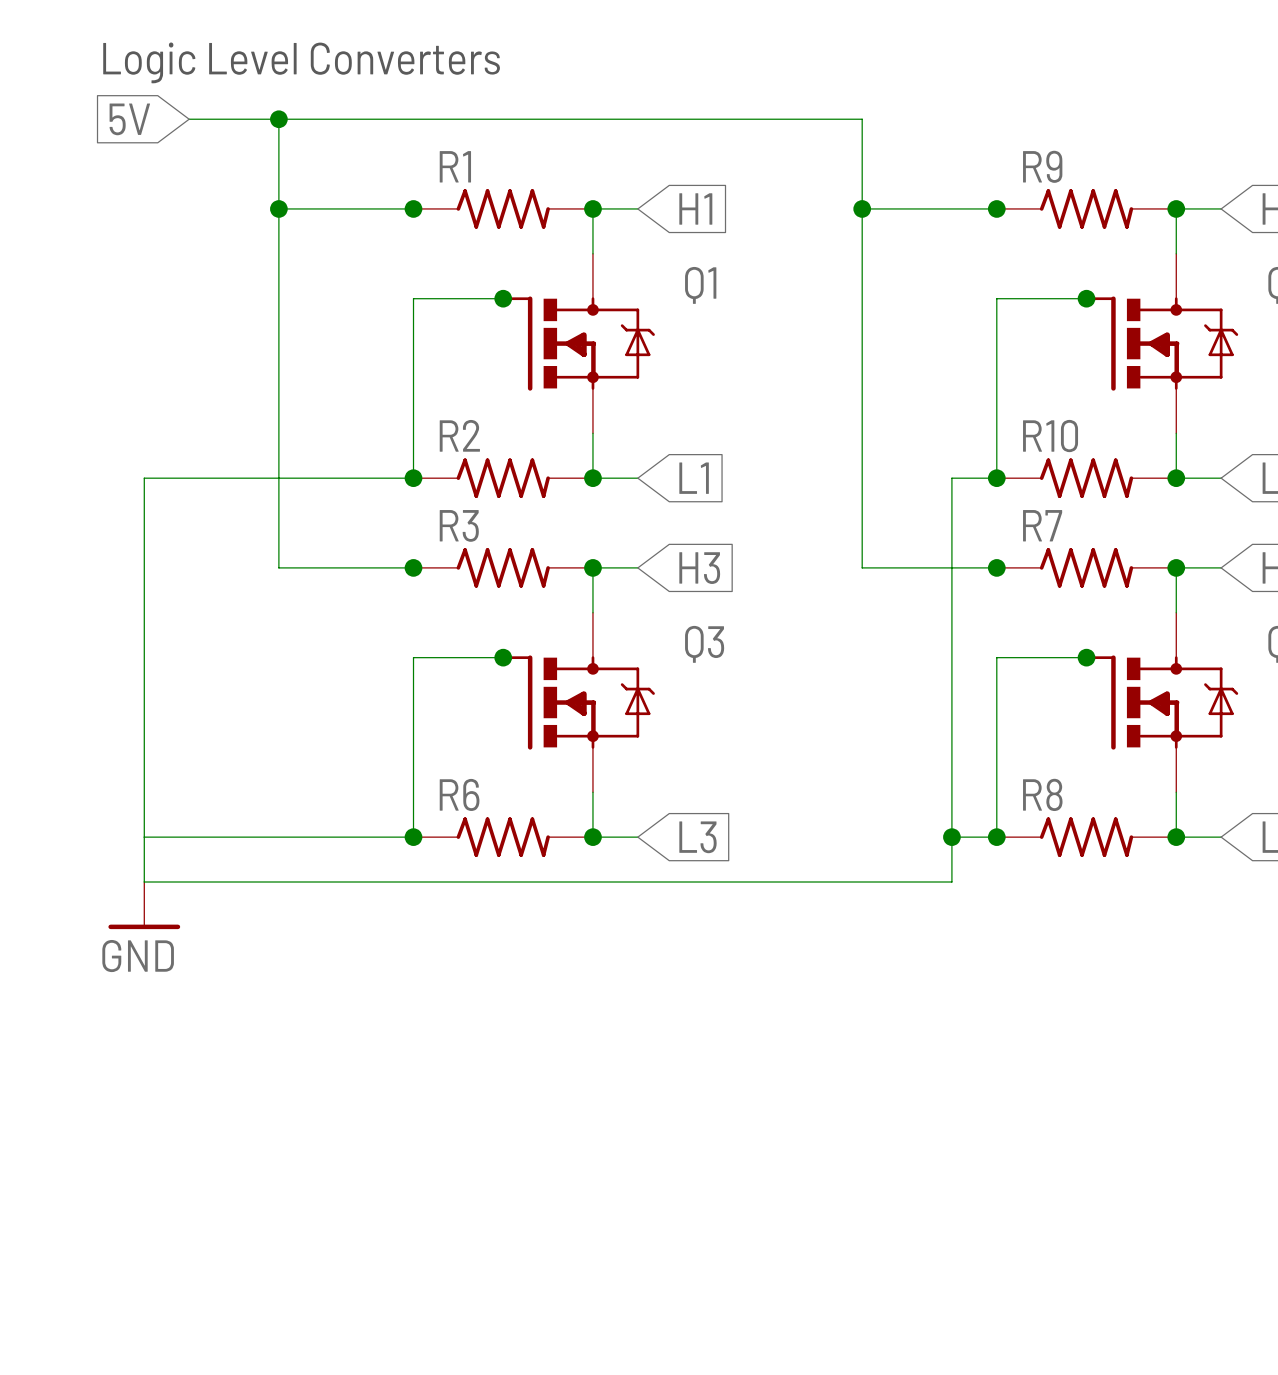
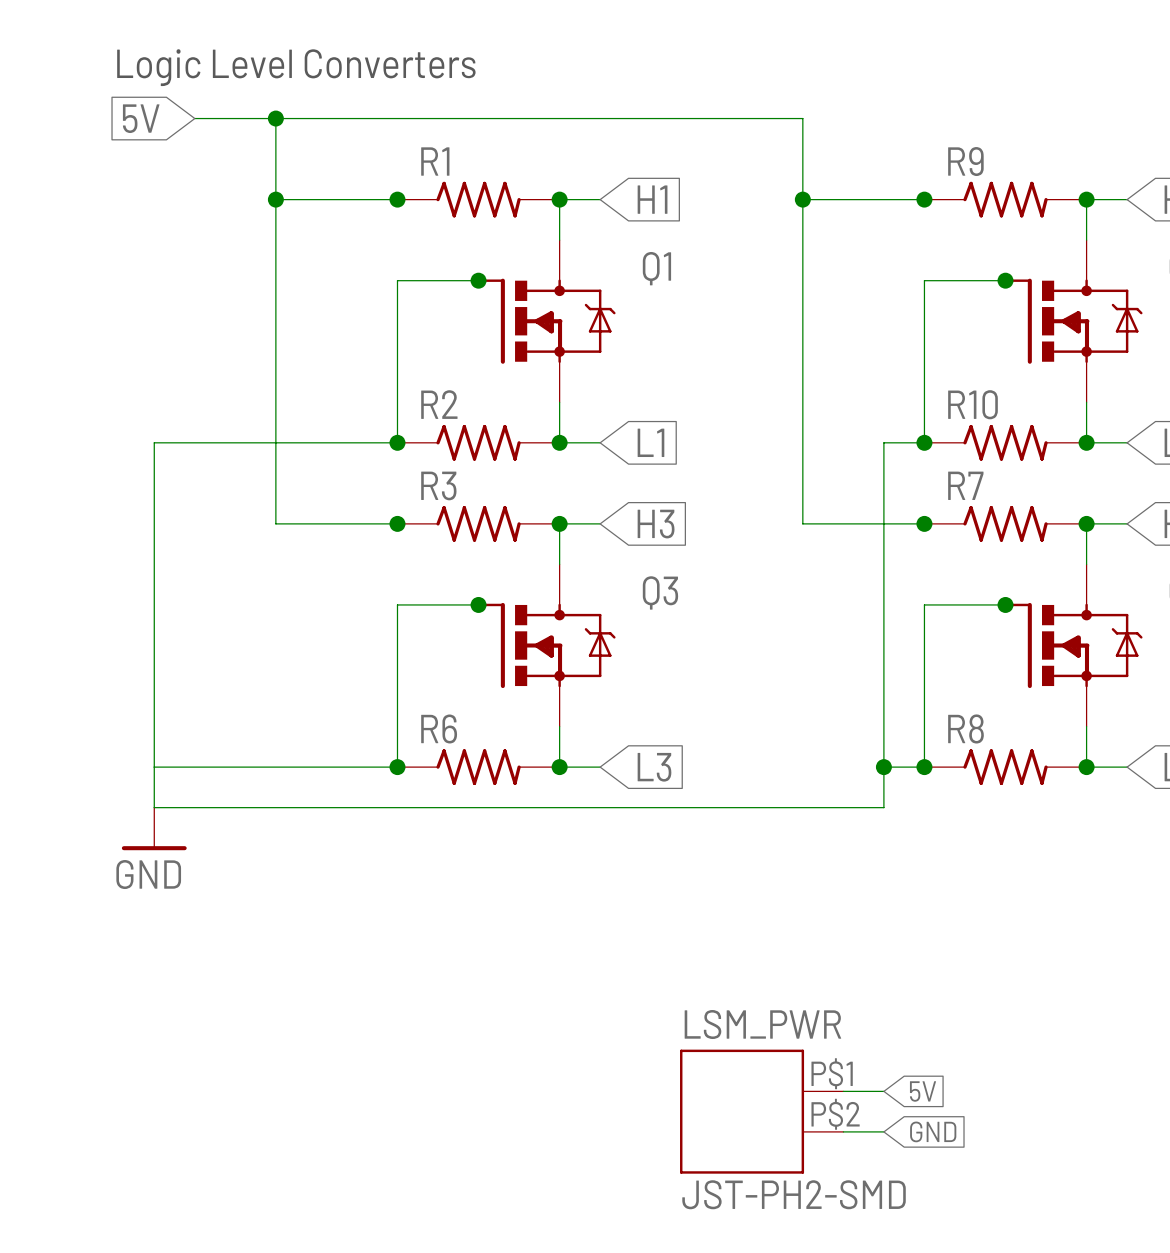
wire: none -> (843, 1091) (883, 1091)
global label: none -> 5V (923, 1091)
LSM_PWR: none -> JST-PH2-SMD (761, 1111)
wire: none -> (843, 1131) (883, 1131)
global label: none -> GND (933, 1131)

